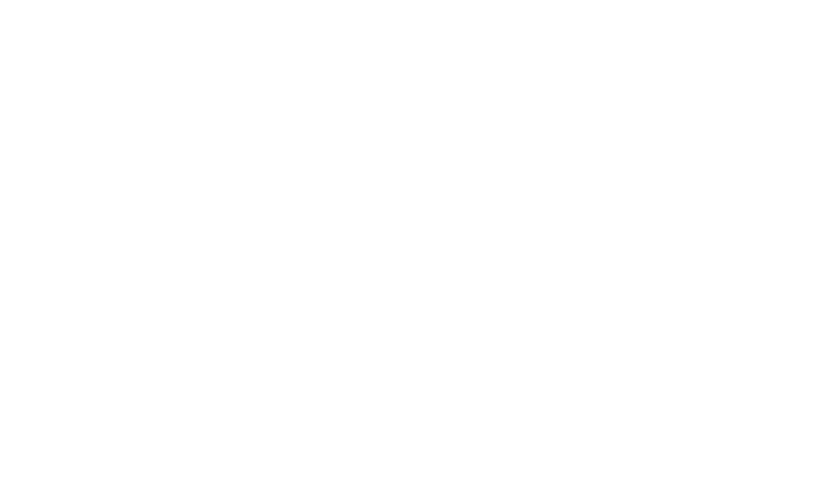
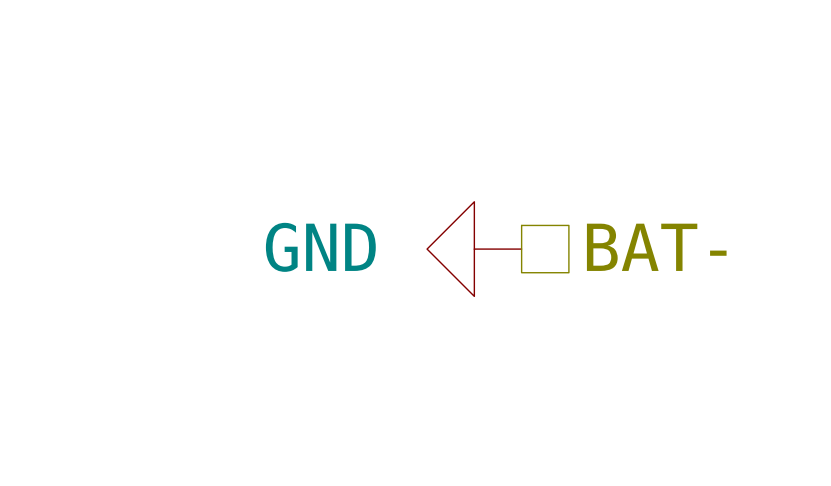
hierarchical label: none -> BAT- (656, 247)
power symbol: none -> GND (474, 249)

